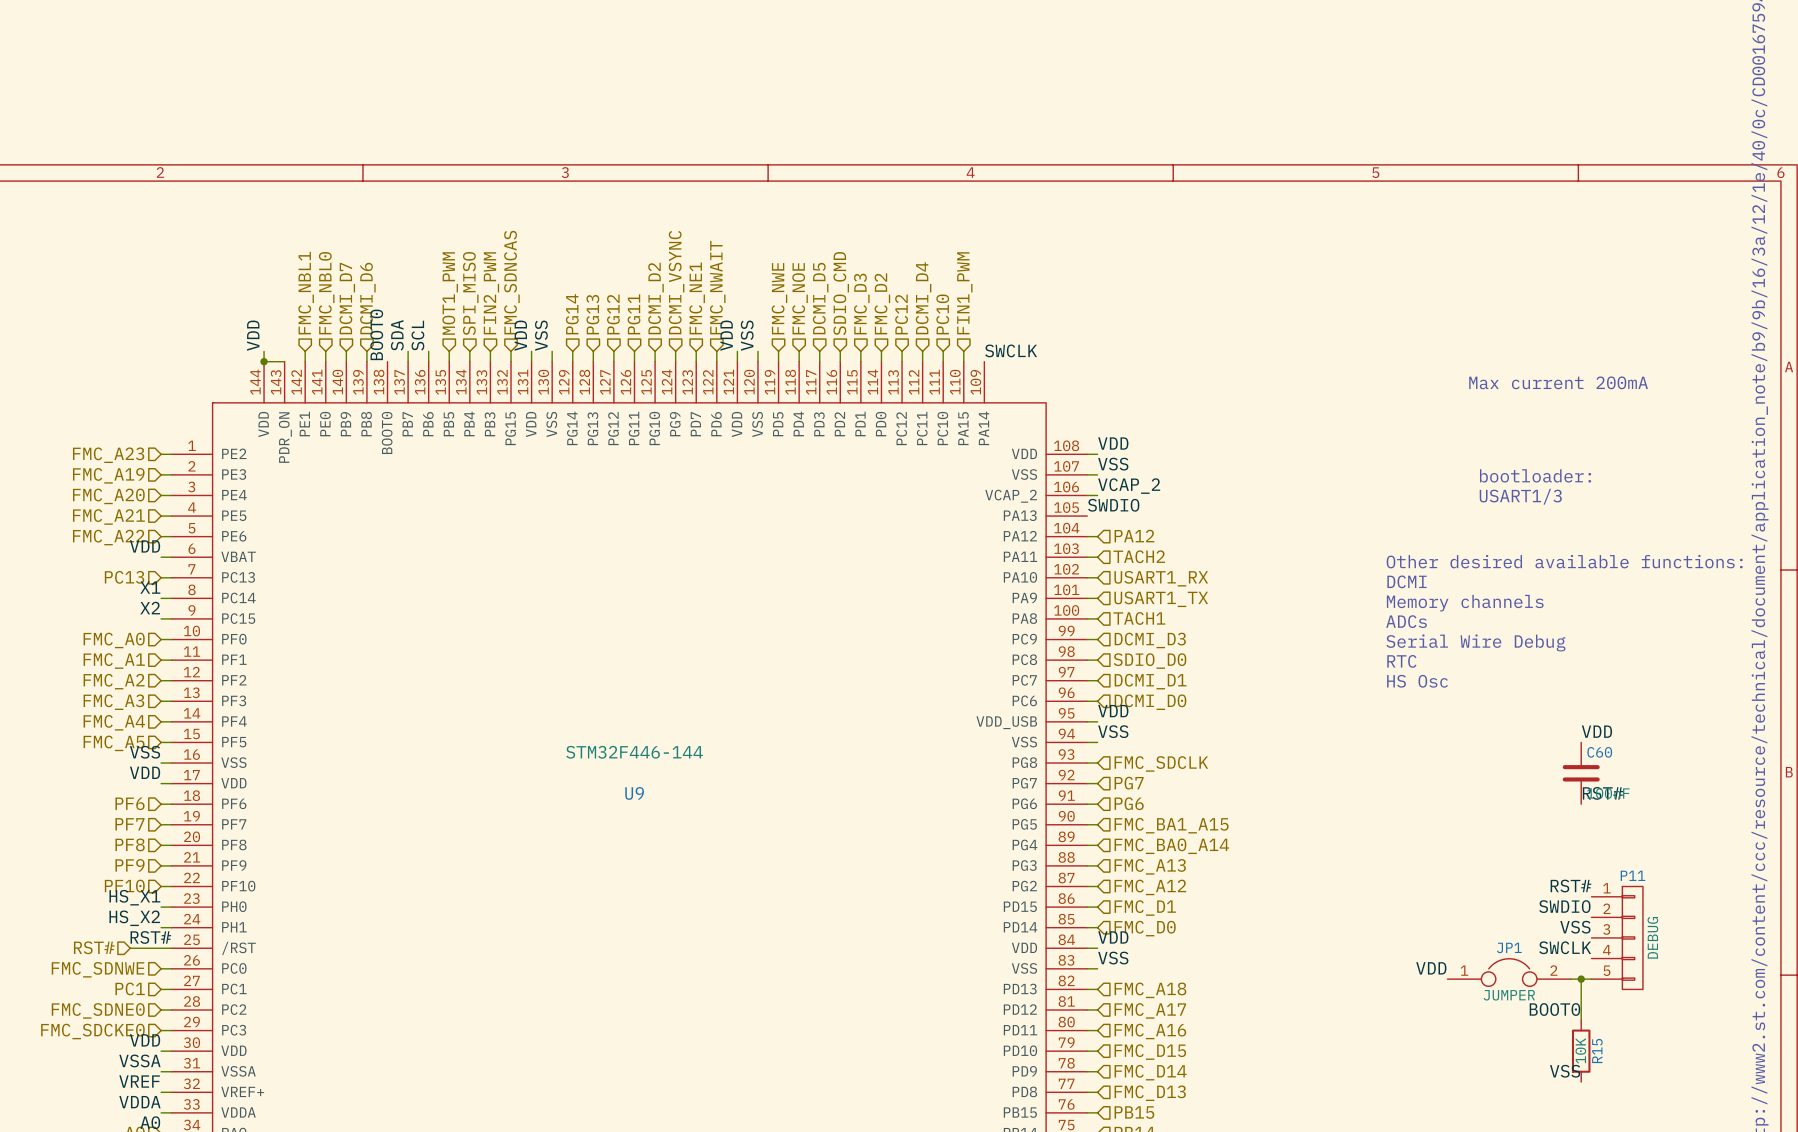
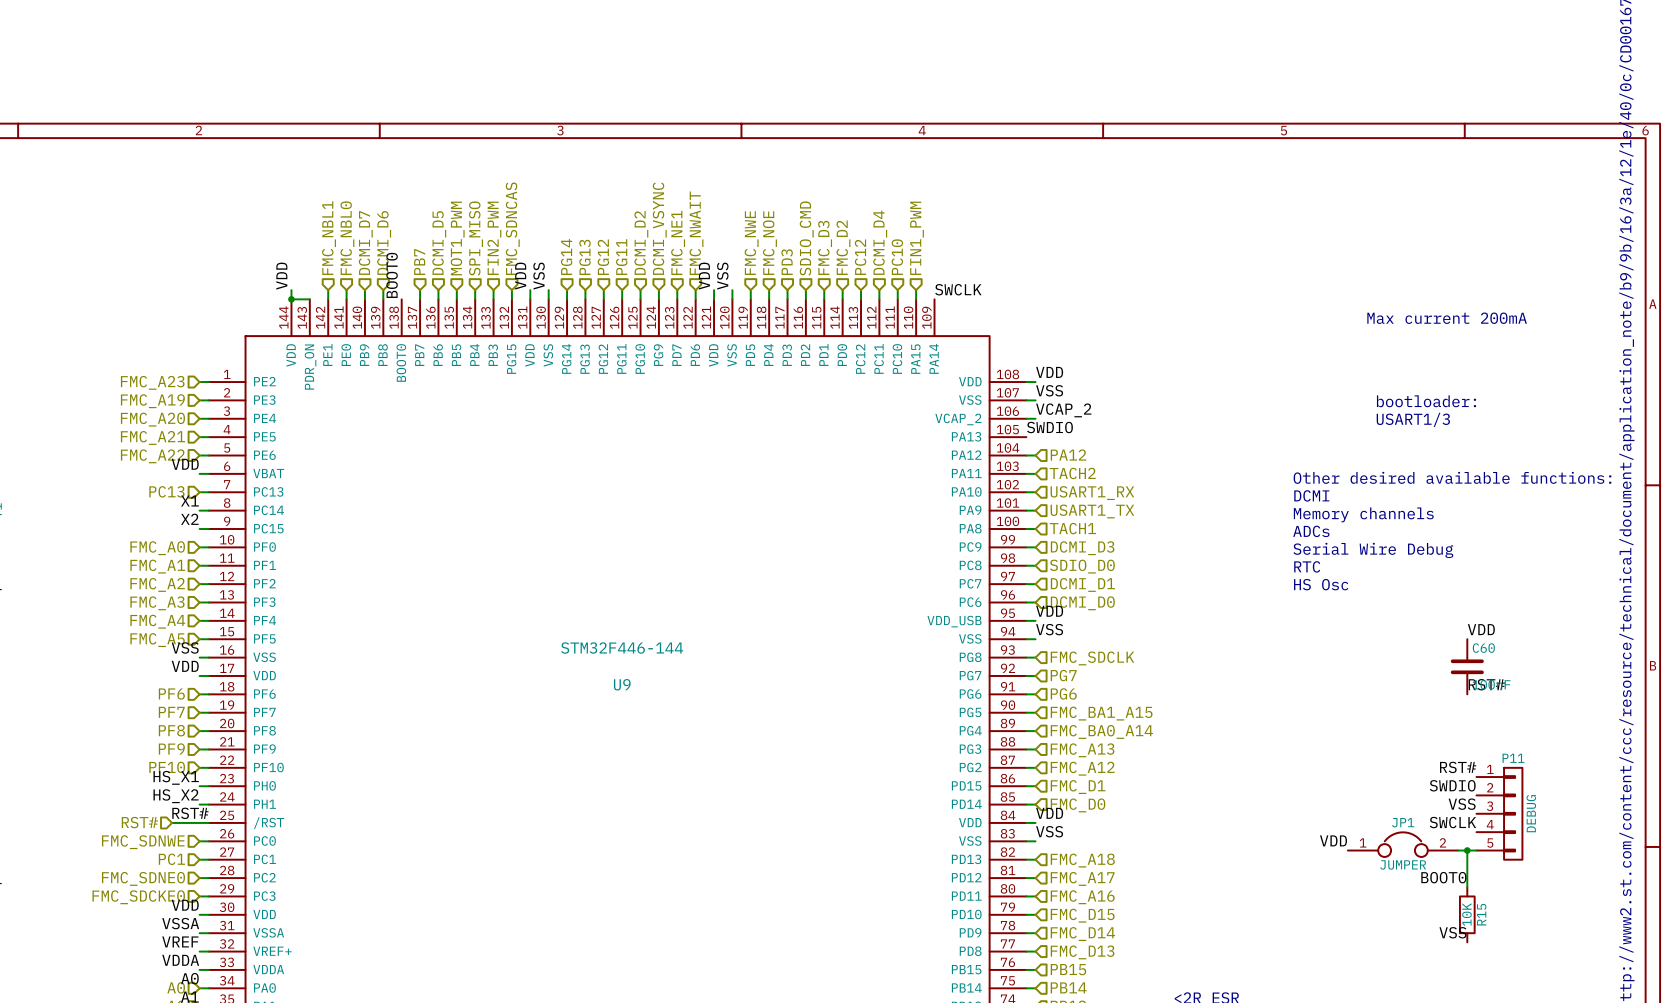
hierarchical label: none -> DCMI_D5 (439, 242)
hierarchical label: DCMI_D5 (820, 298) -> PD3 (787, 262)
hierarchical label: none -> PB7 (419, 262)
label: SDA (397, 335) -> none
label: SCL (417, 335) -> none

